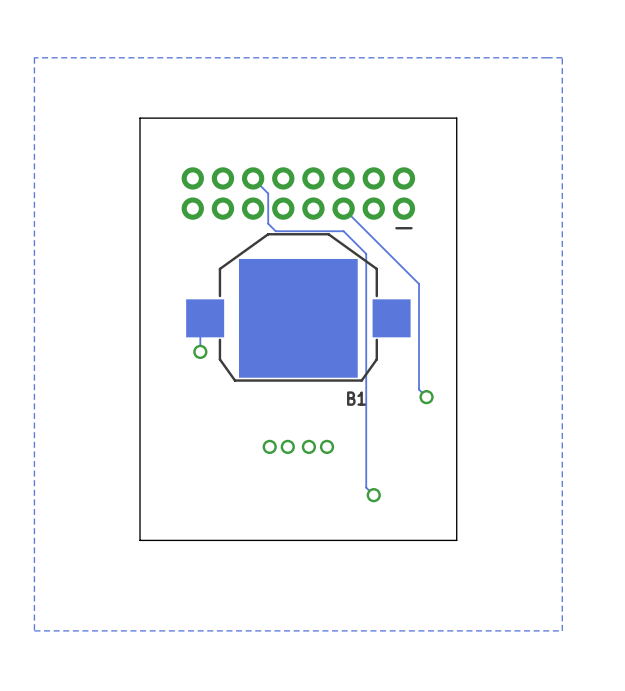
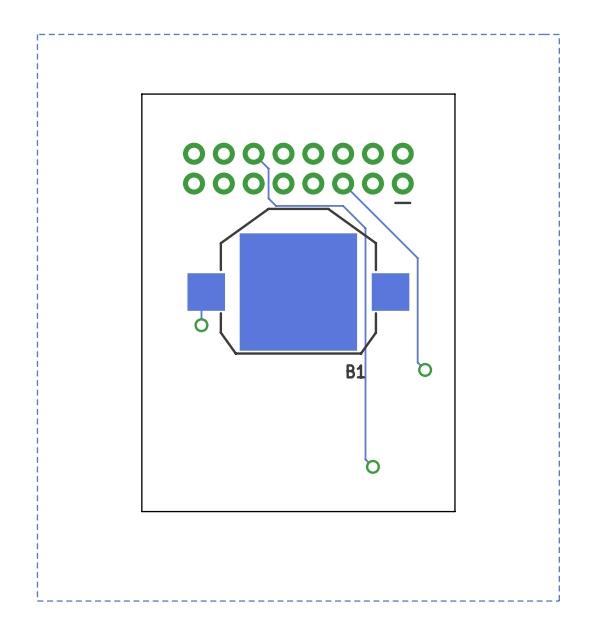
via: (269, 446) -> none
via: (287, 446) -> none
via: (308, 446) -> none
via: (327, 446) -> none

